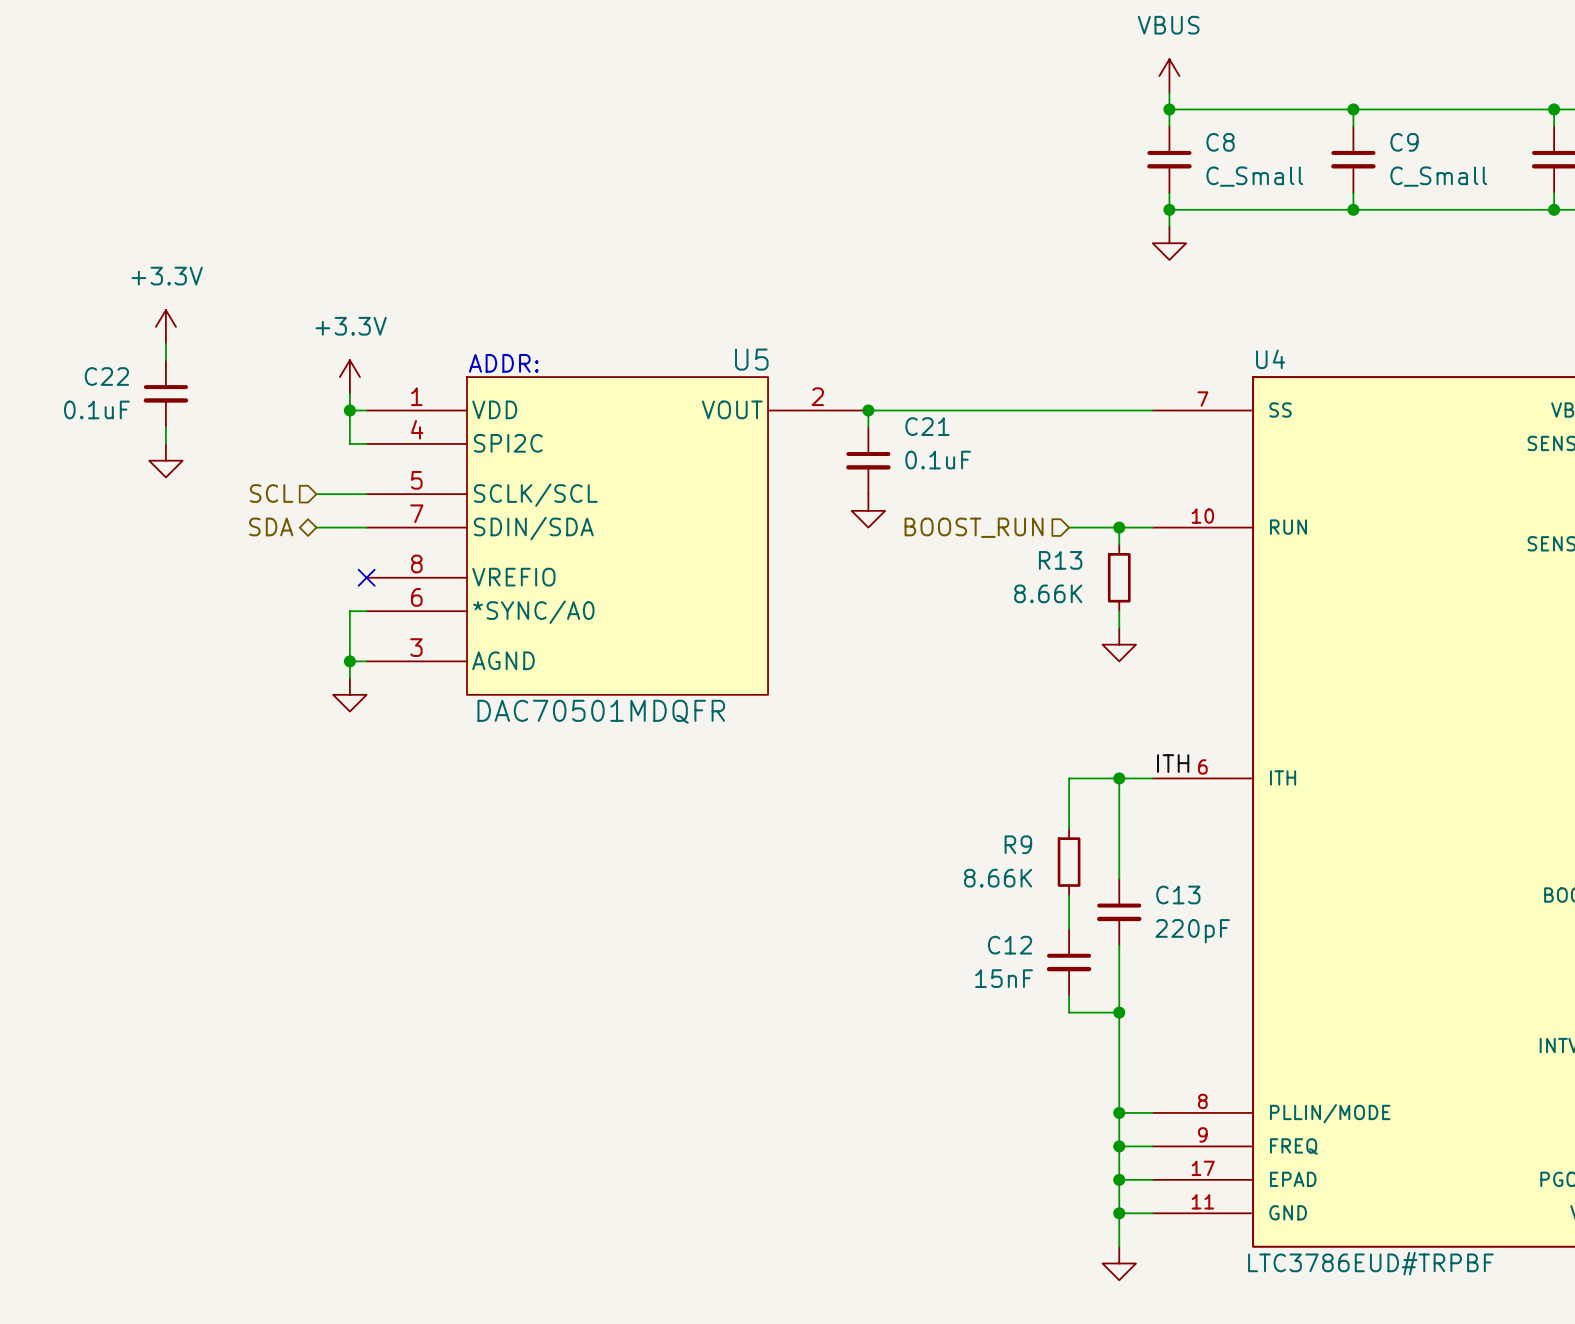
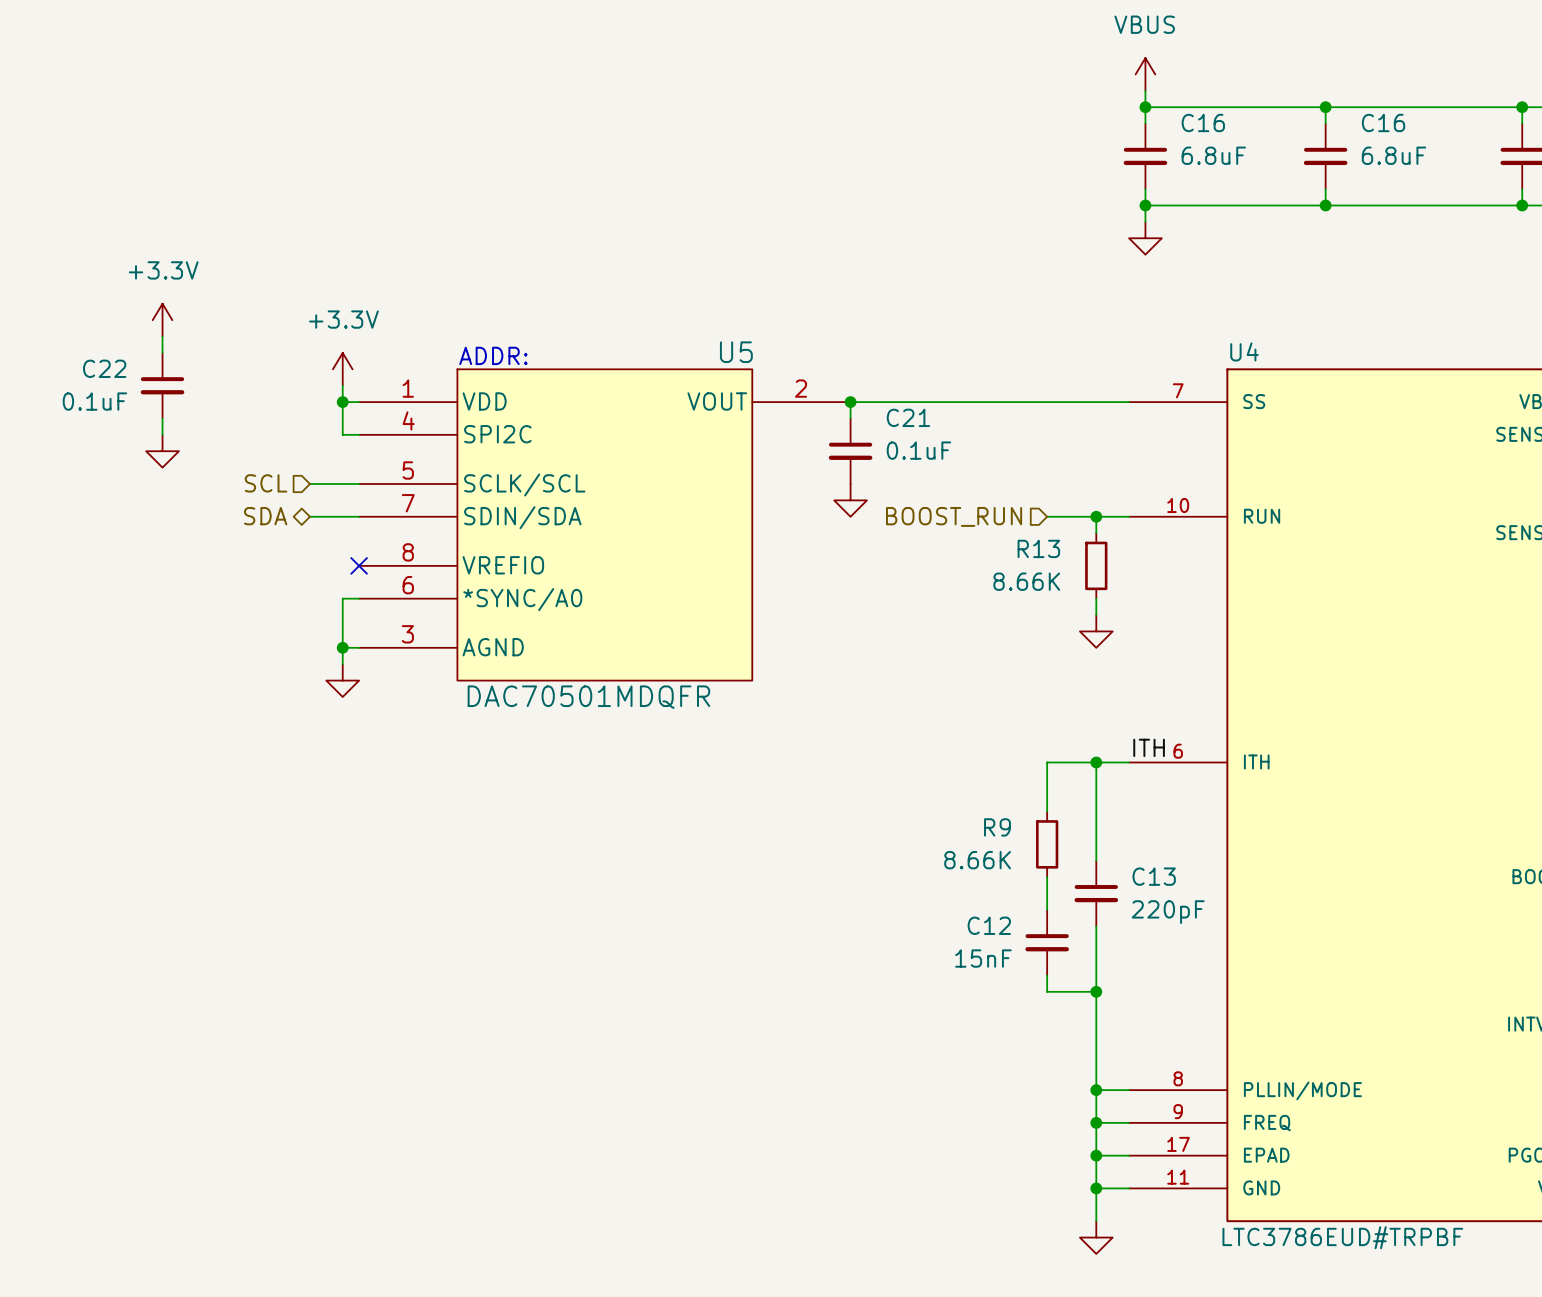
C8 name: C8 (1220, 142) -> C16 (1203, 122)
C9 name: C9 (1404, 142) -> C16 (1383, 122)
C8 value: C_Small (1254, 176) -> 6.8uF (1213, 155)
C9 value: C_Small (1438, 176) -> 6.8uF (1394, 155)

